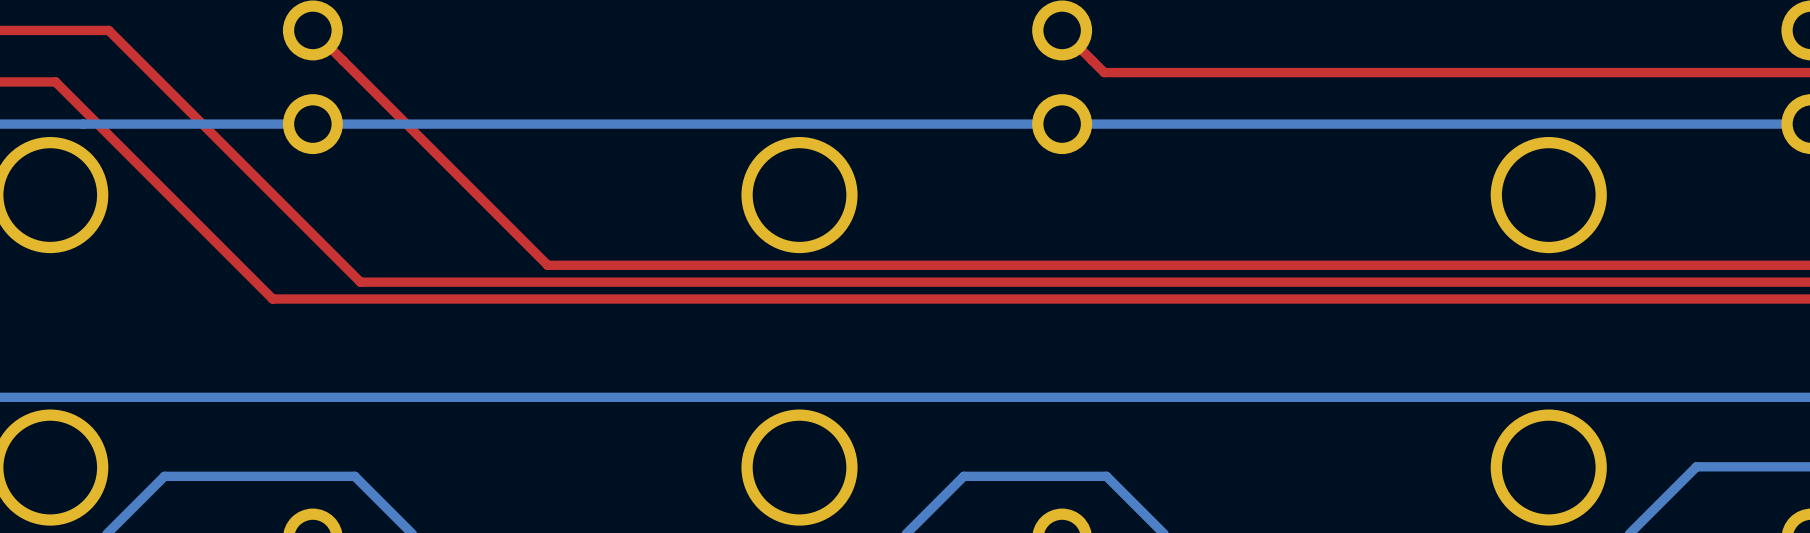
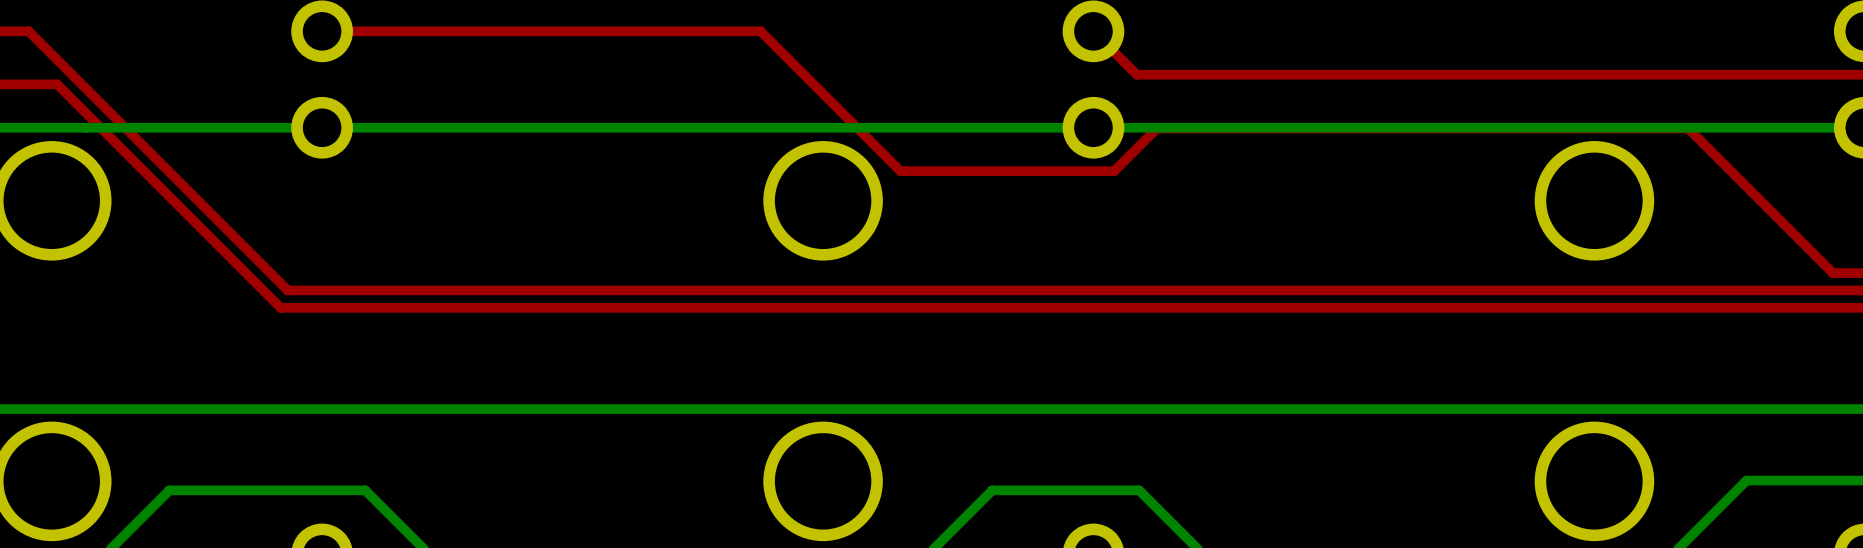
top track: (27, 30) (108, 30) (360, 282) -> (28, 31) (287, 290) (371, 290)
top track: (312, 30) (547, 265) (1780, 265) -> (322, 31) (760, 31) (900, 171) (1114, 171) (1156, 128) (1688, 128) (1832, 273)

